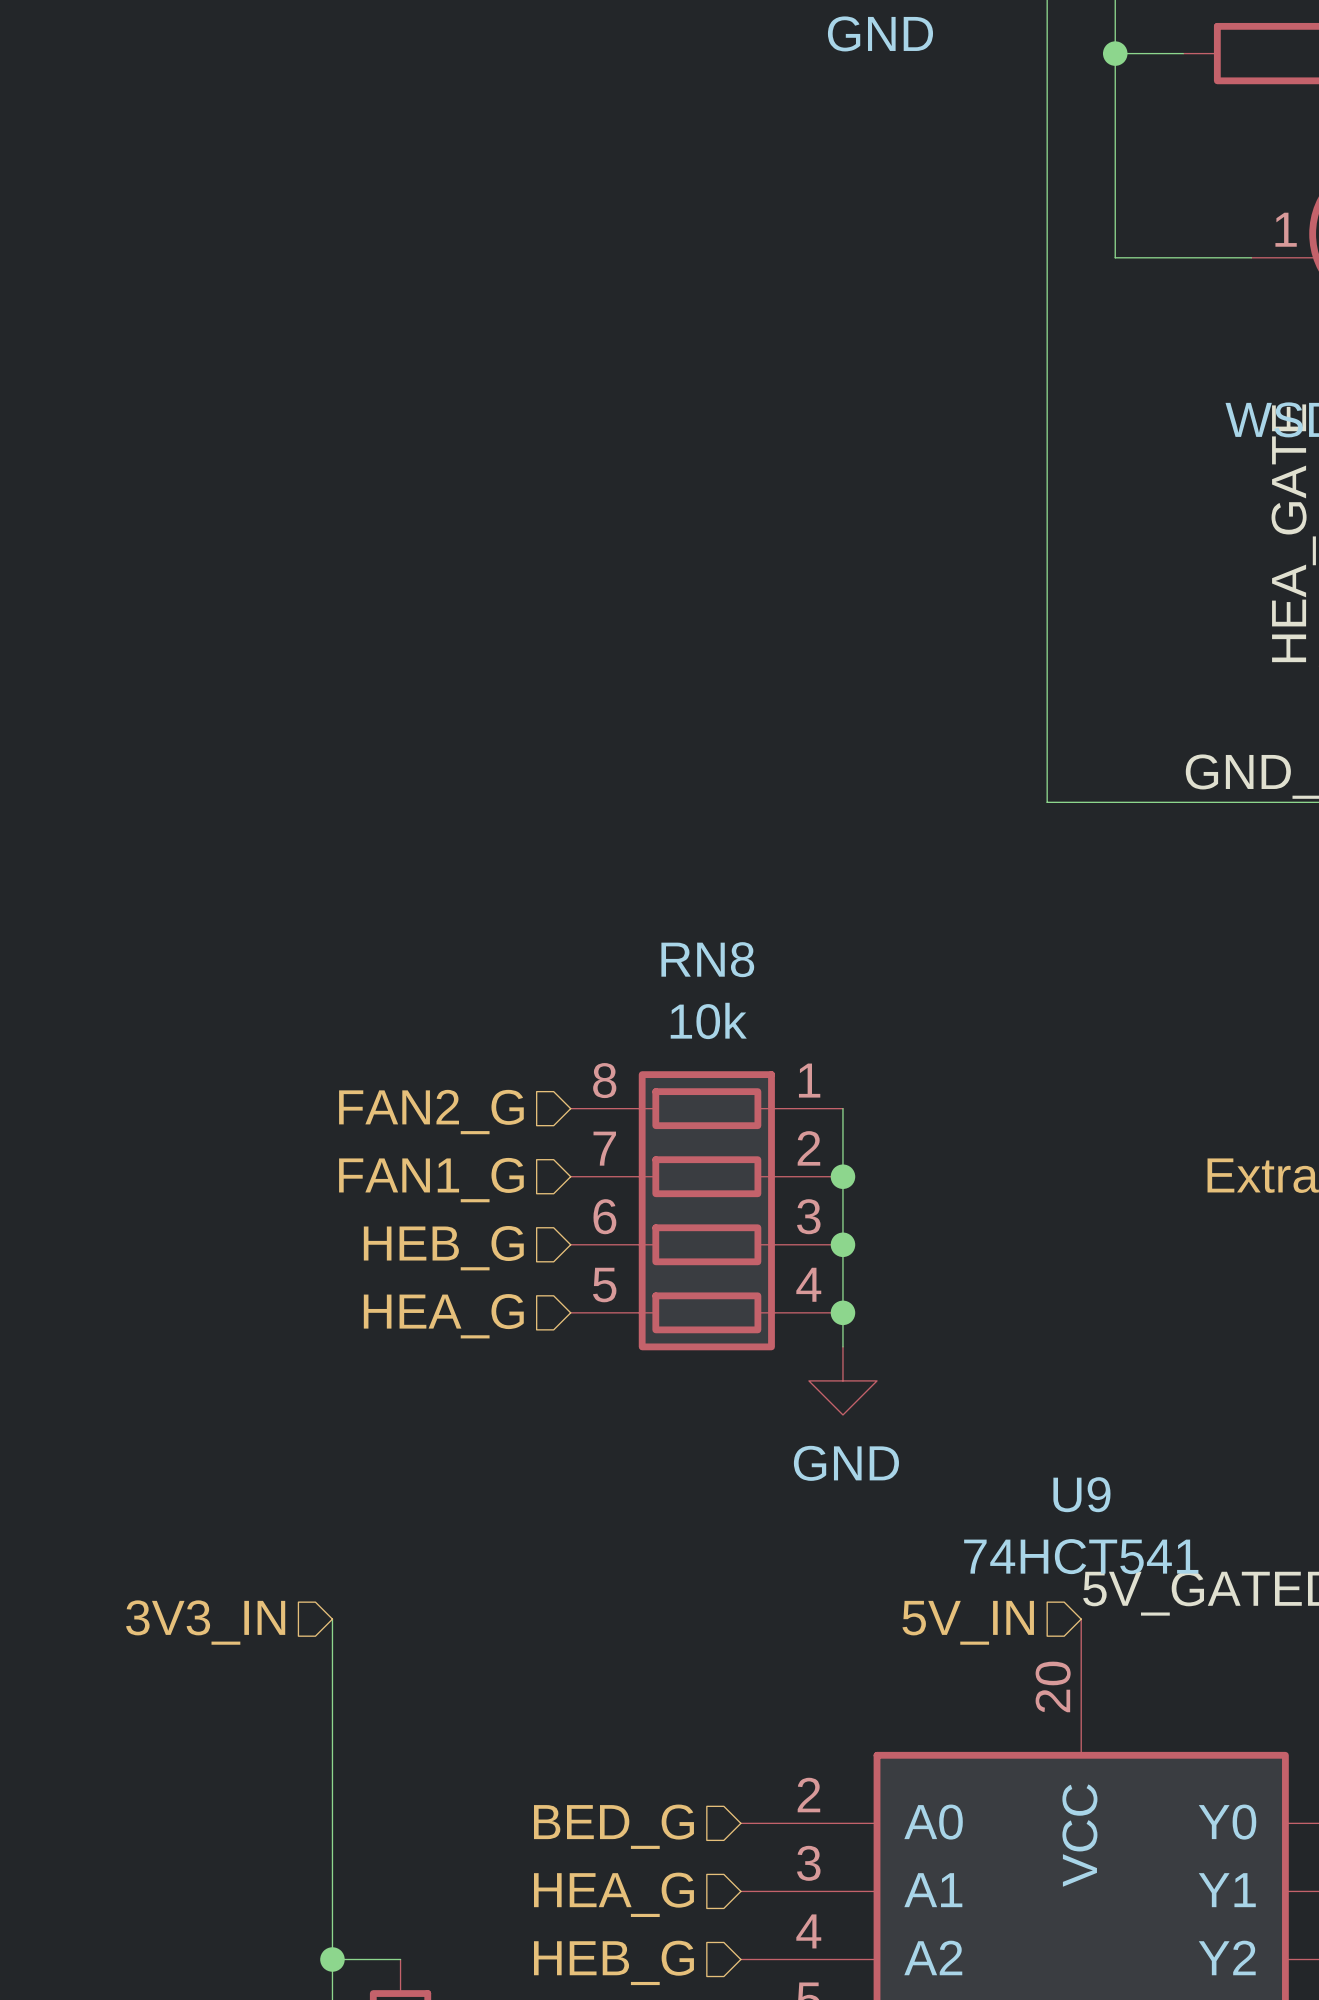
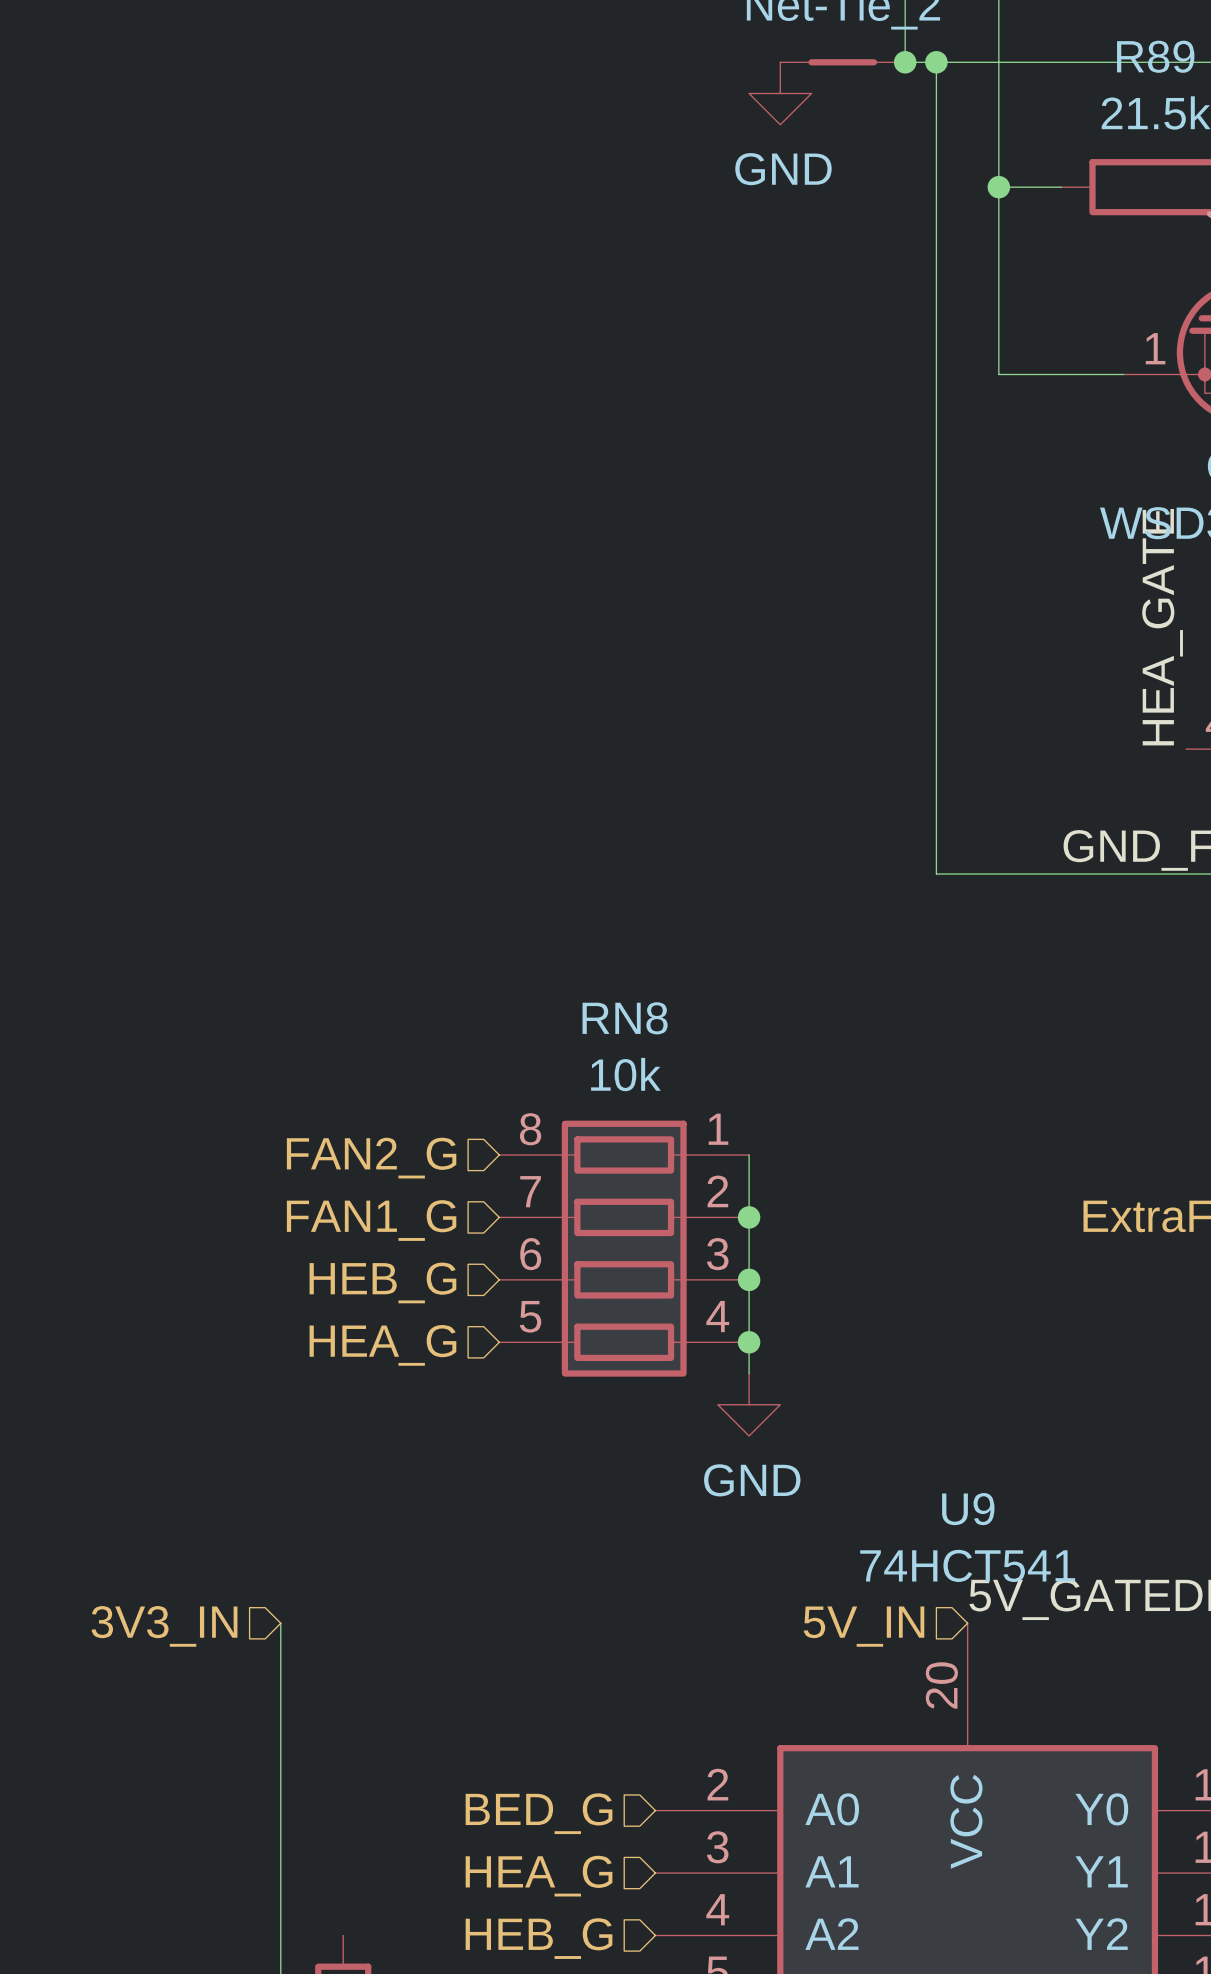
wire: (332, 1959) (400, 1959) -> none
junction: (332, 1959) -> none

